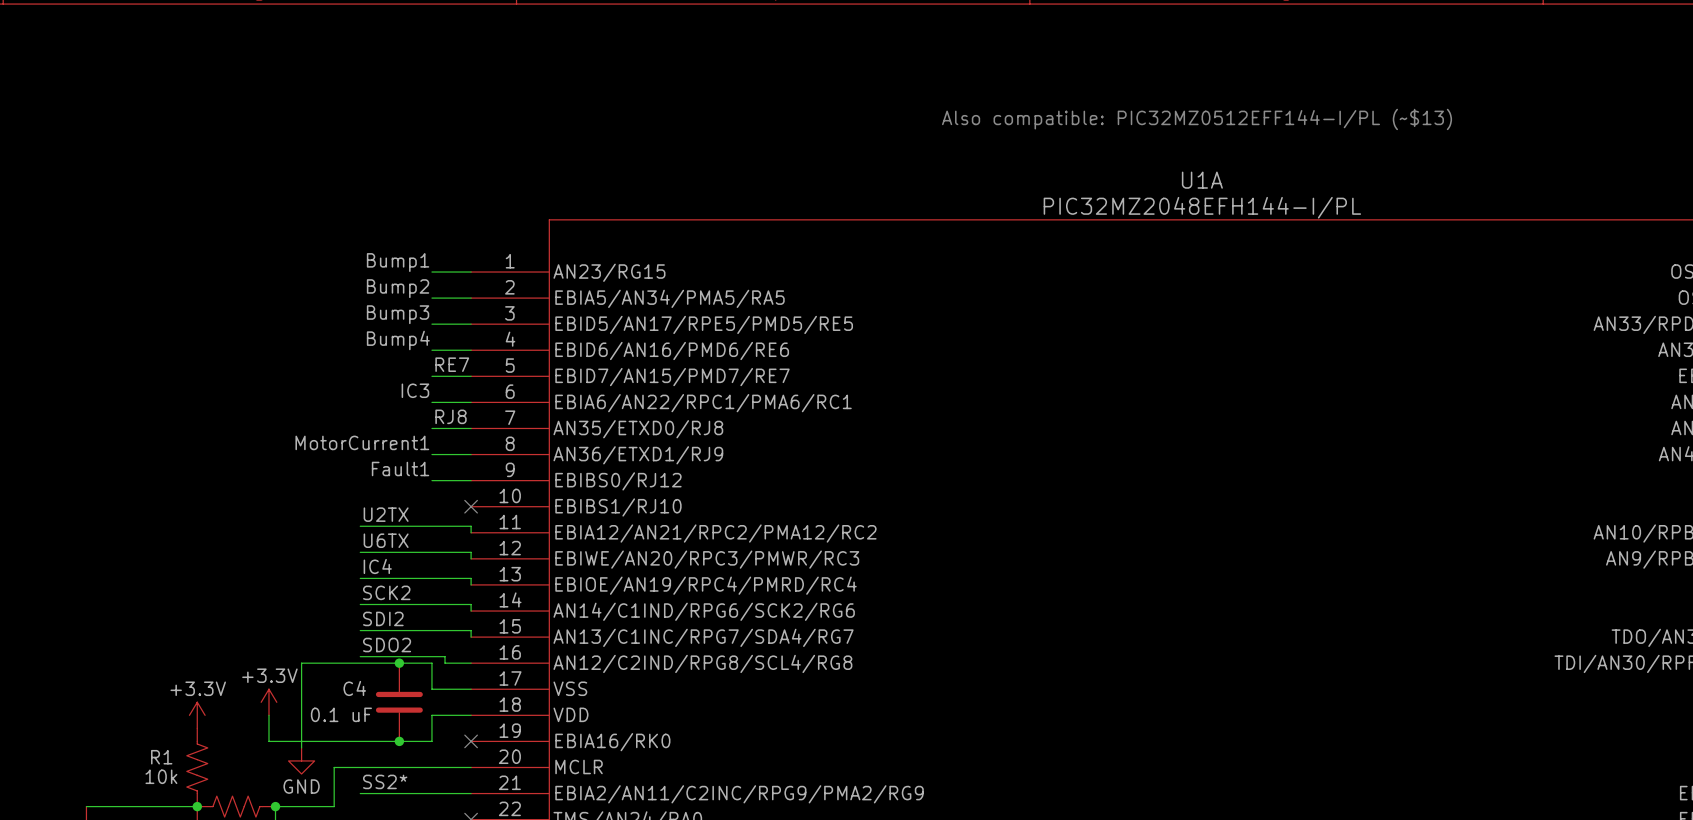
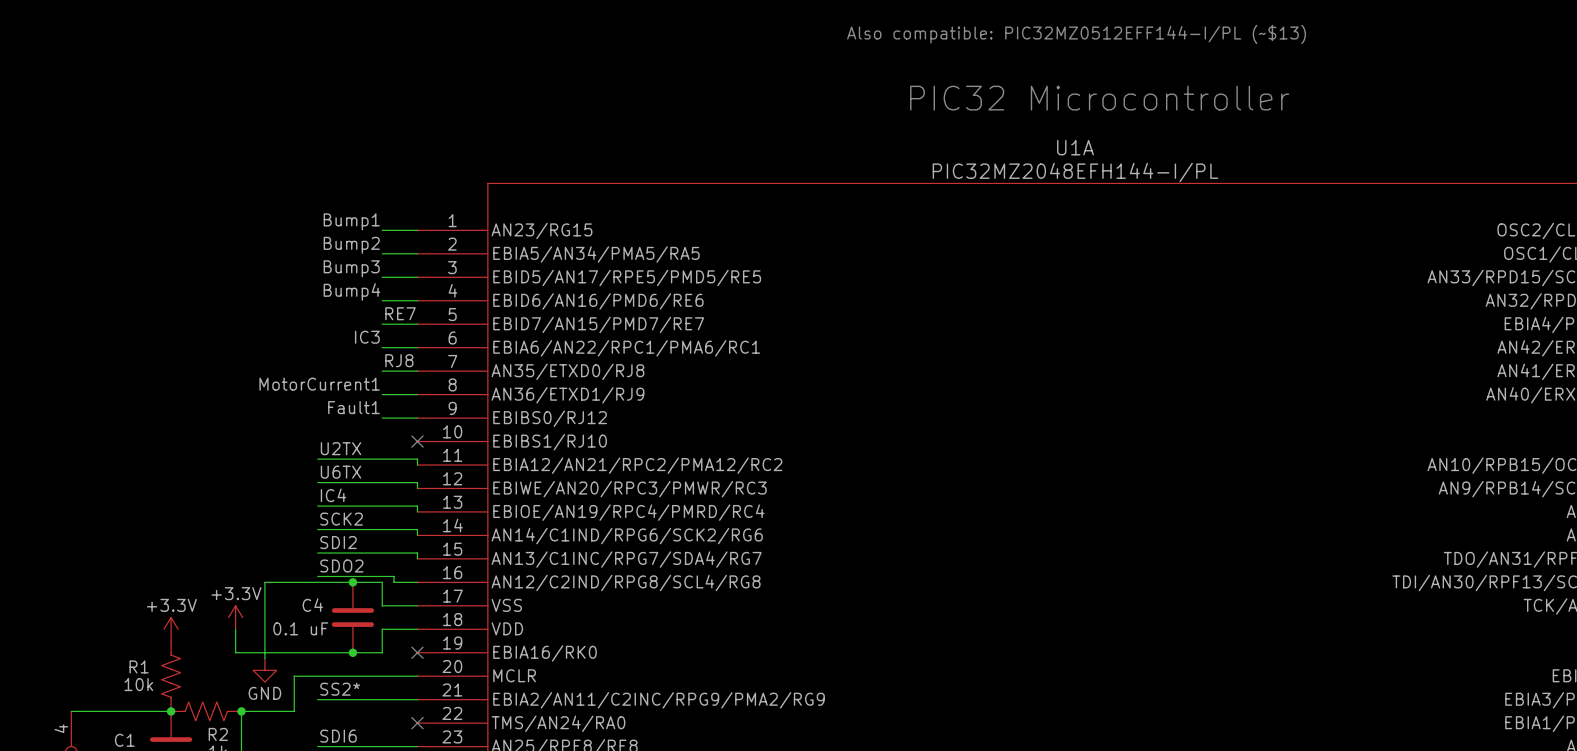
text position: Also compatible: PIC32MZ0512EFF144-I/PL (~$13) (1197, 119) -> Also compatible: PIC32MZ0512EFF144-I/PL (~$13) (1076, 34)
text: none -> PIC32 Microcontroller (1099, 98)

